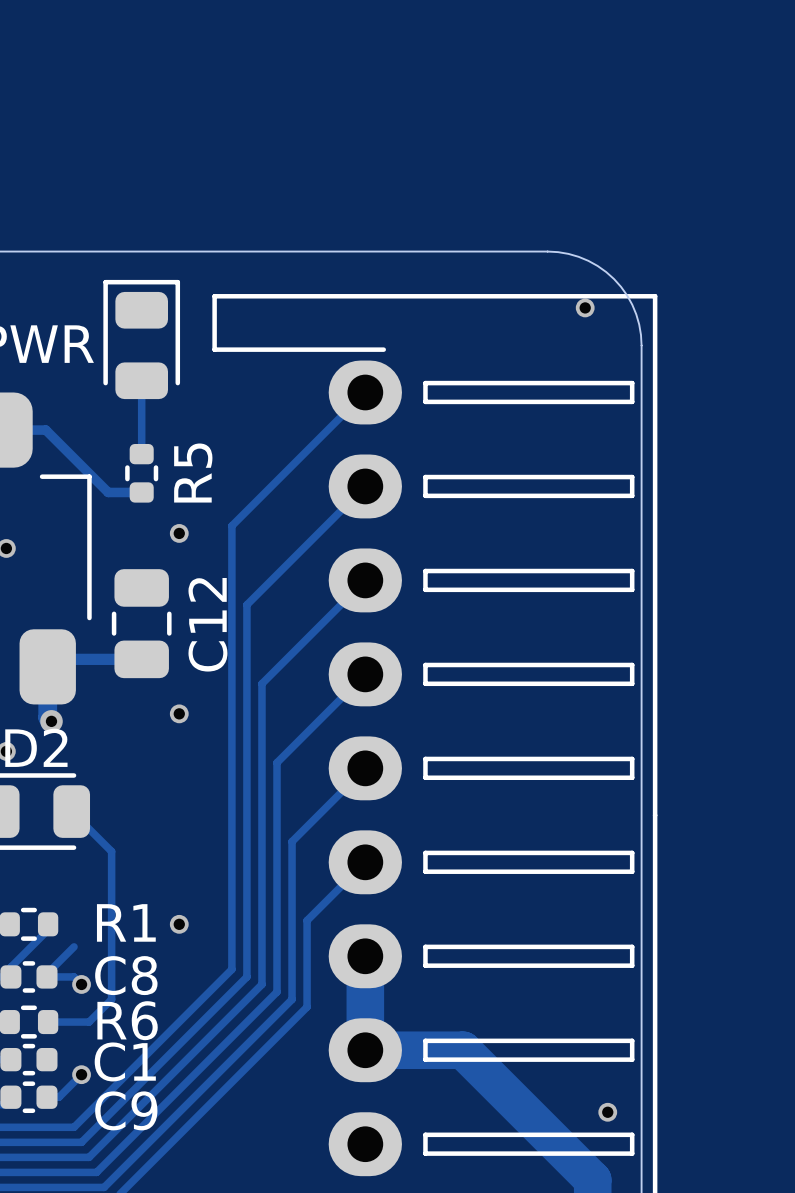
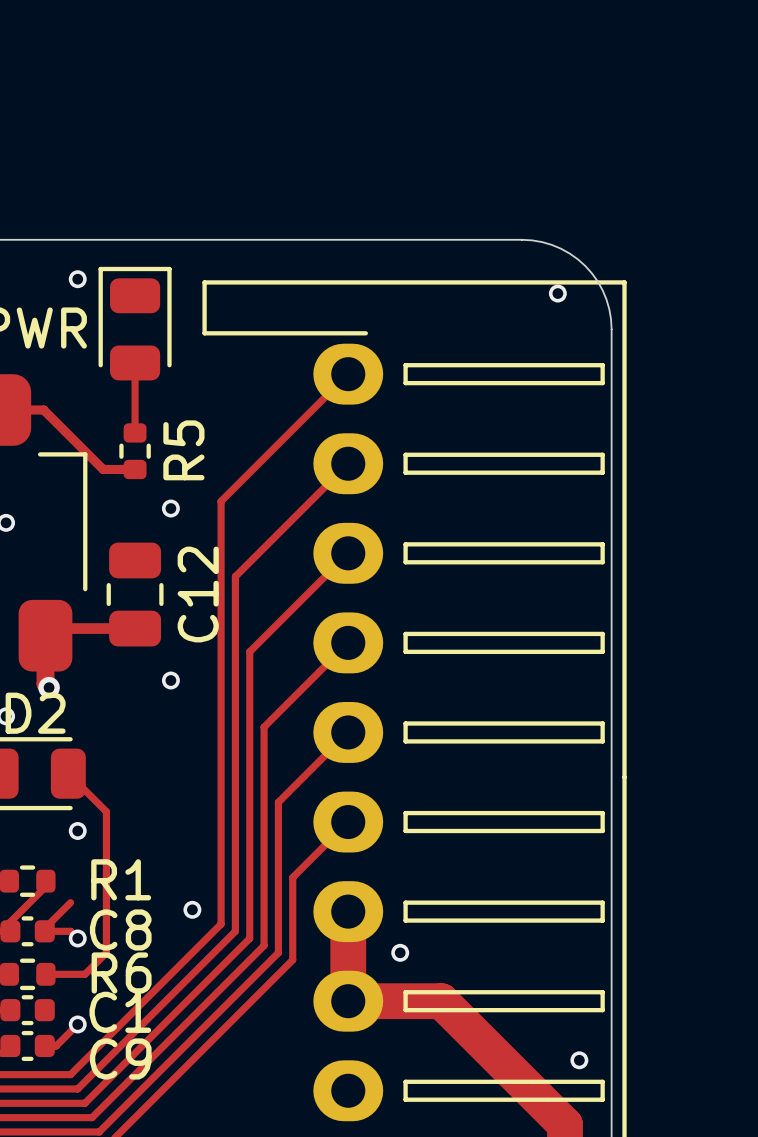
via: none -> (77, 279)
via: none -> (77, 831)
via position: (179, 924) -> (192, 909)
via: none -> (400, 952)

